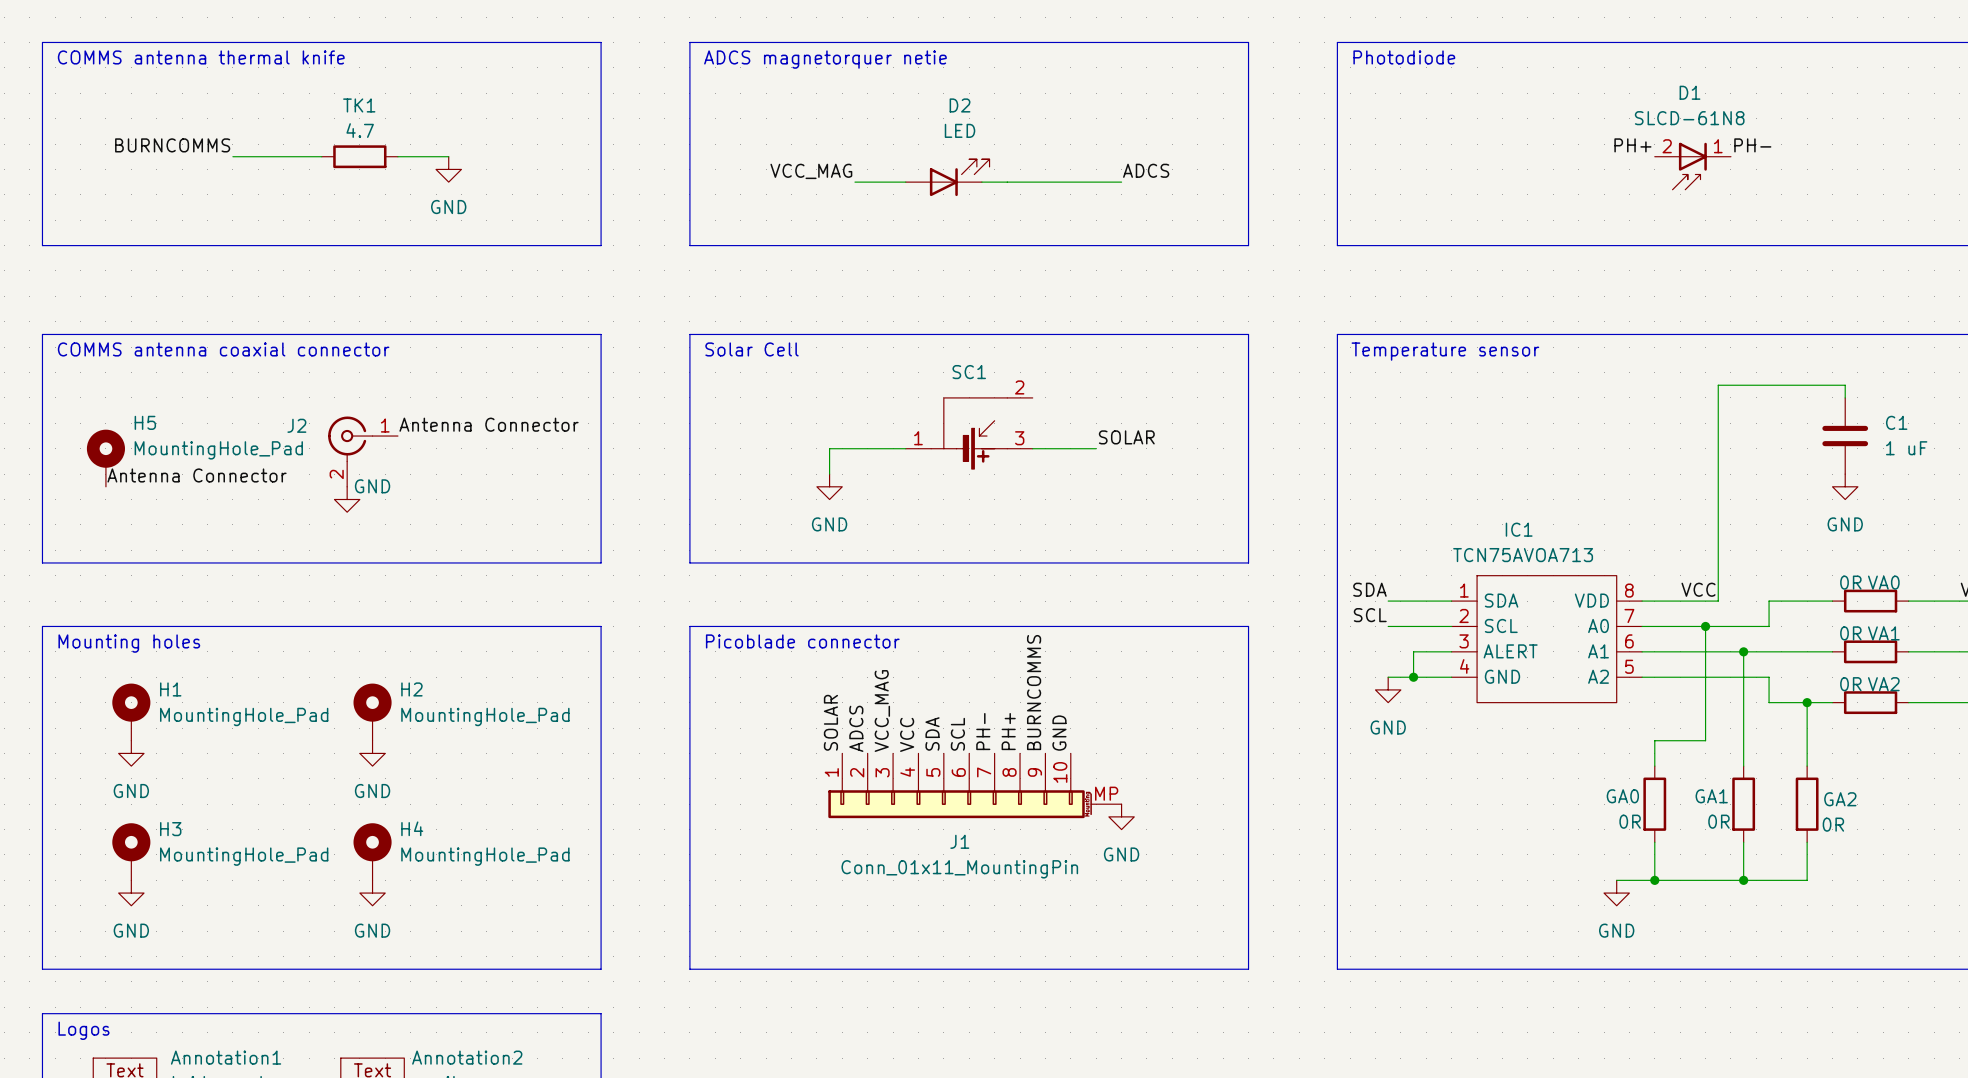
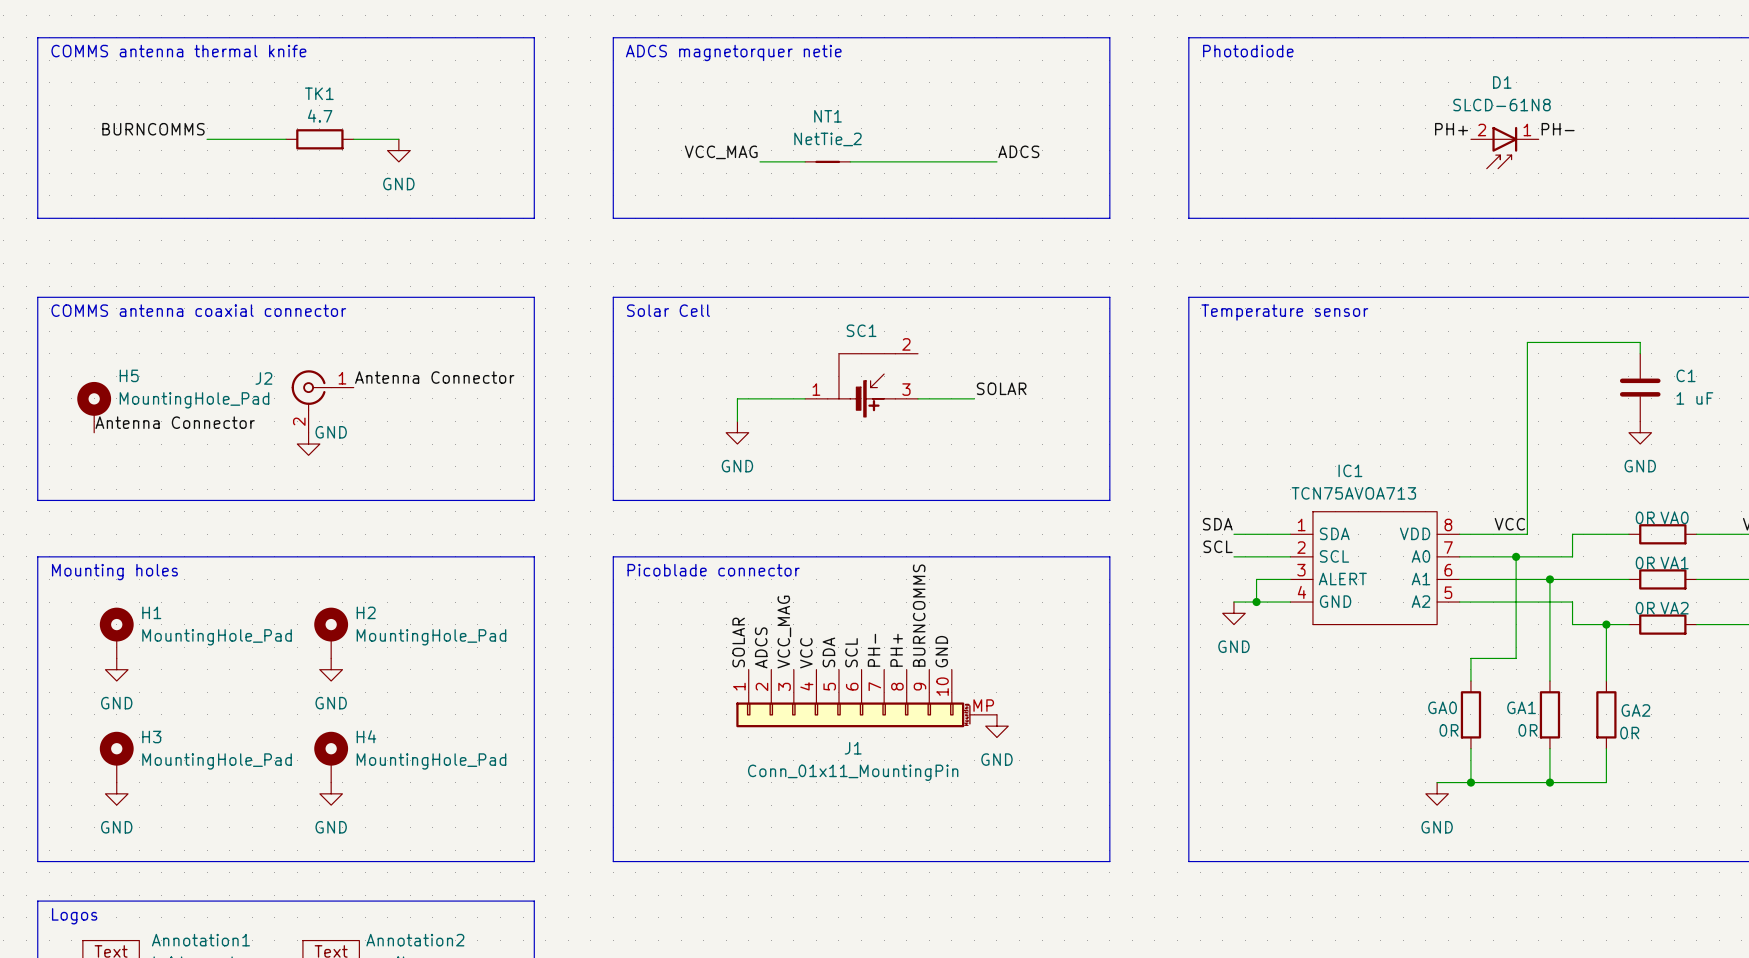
D2: LED (947, 177) -> none
NT1: none -> NetTie_2 (827, 161)

